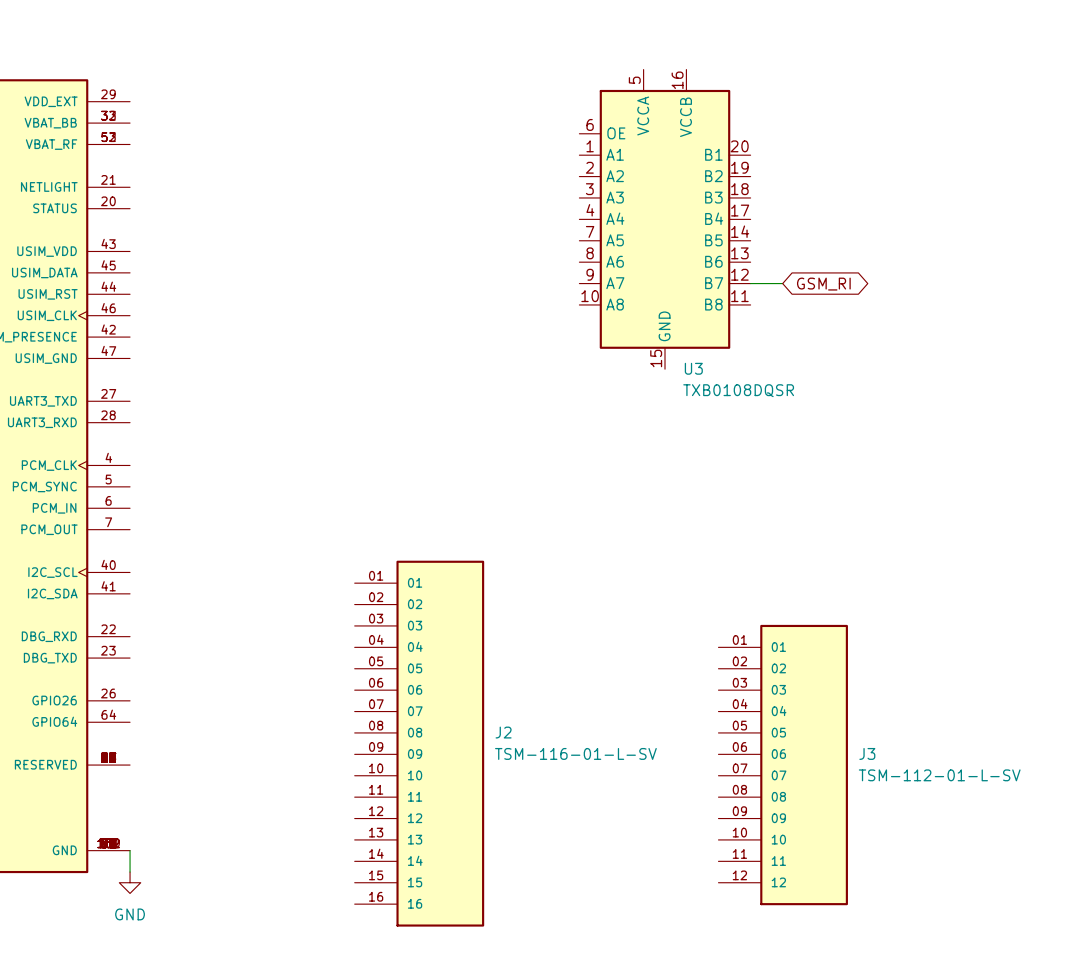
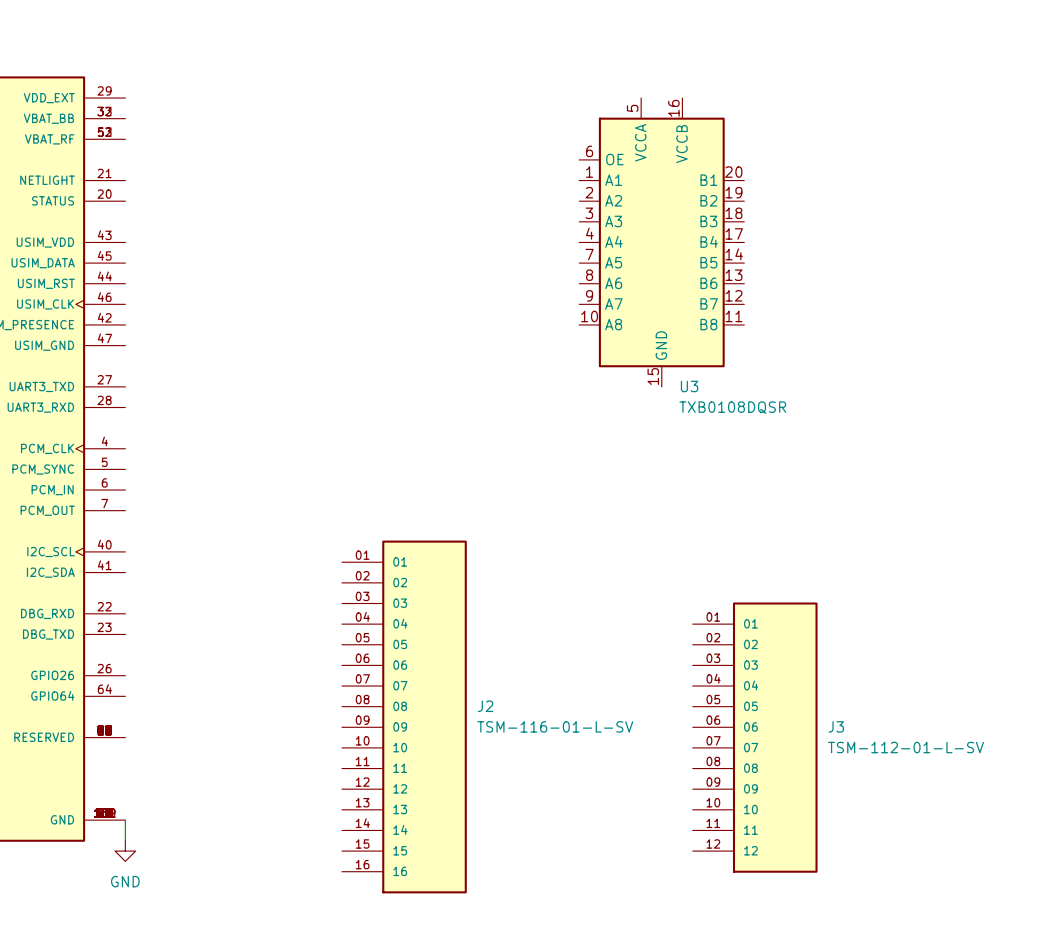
U3 position: (665, 219) -> (661, 242)
wire: (750, 283) (782, 283) -> none
global label: GSM_RI (823, 284) -> none

